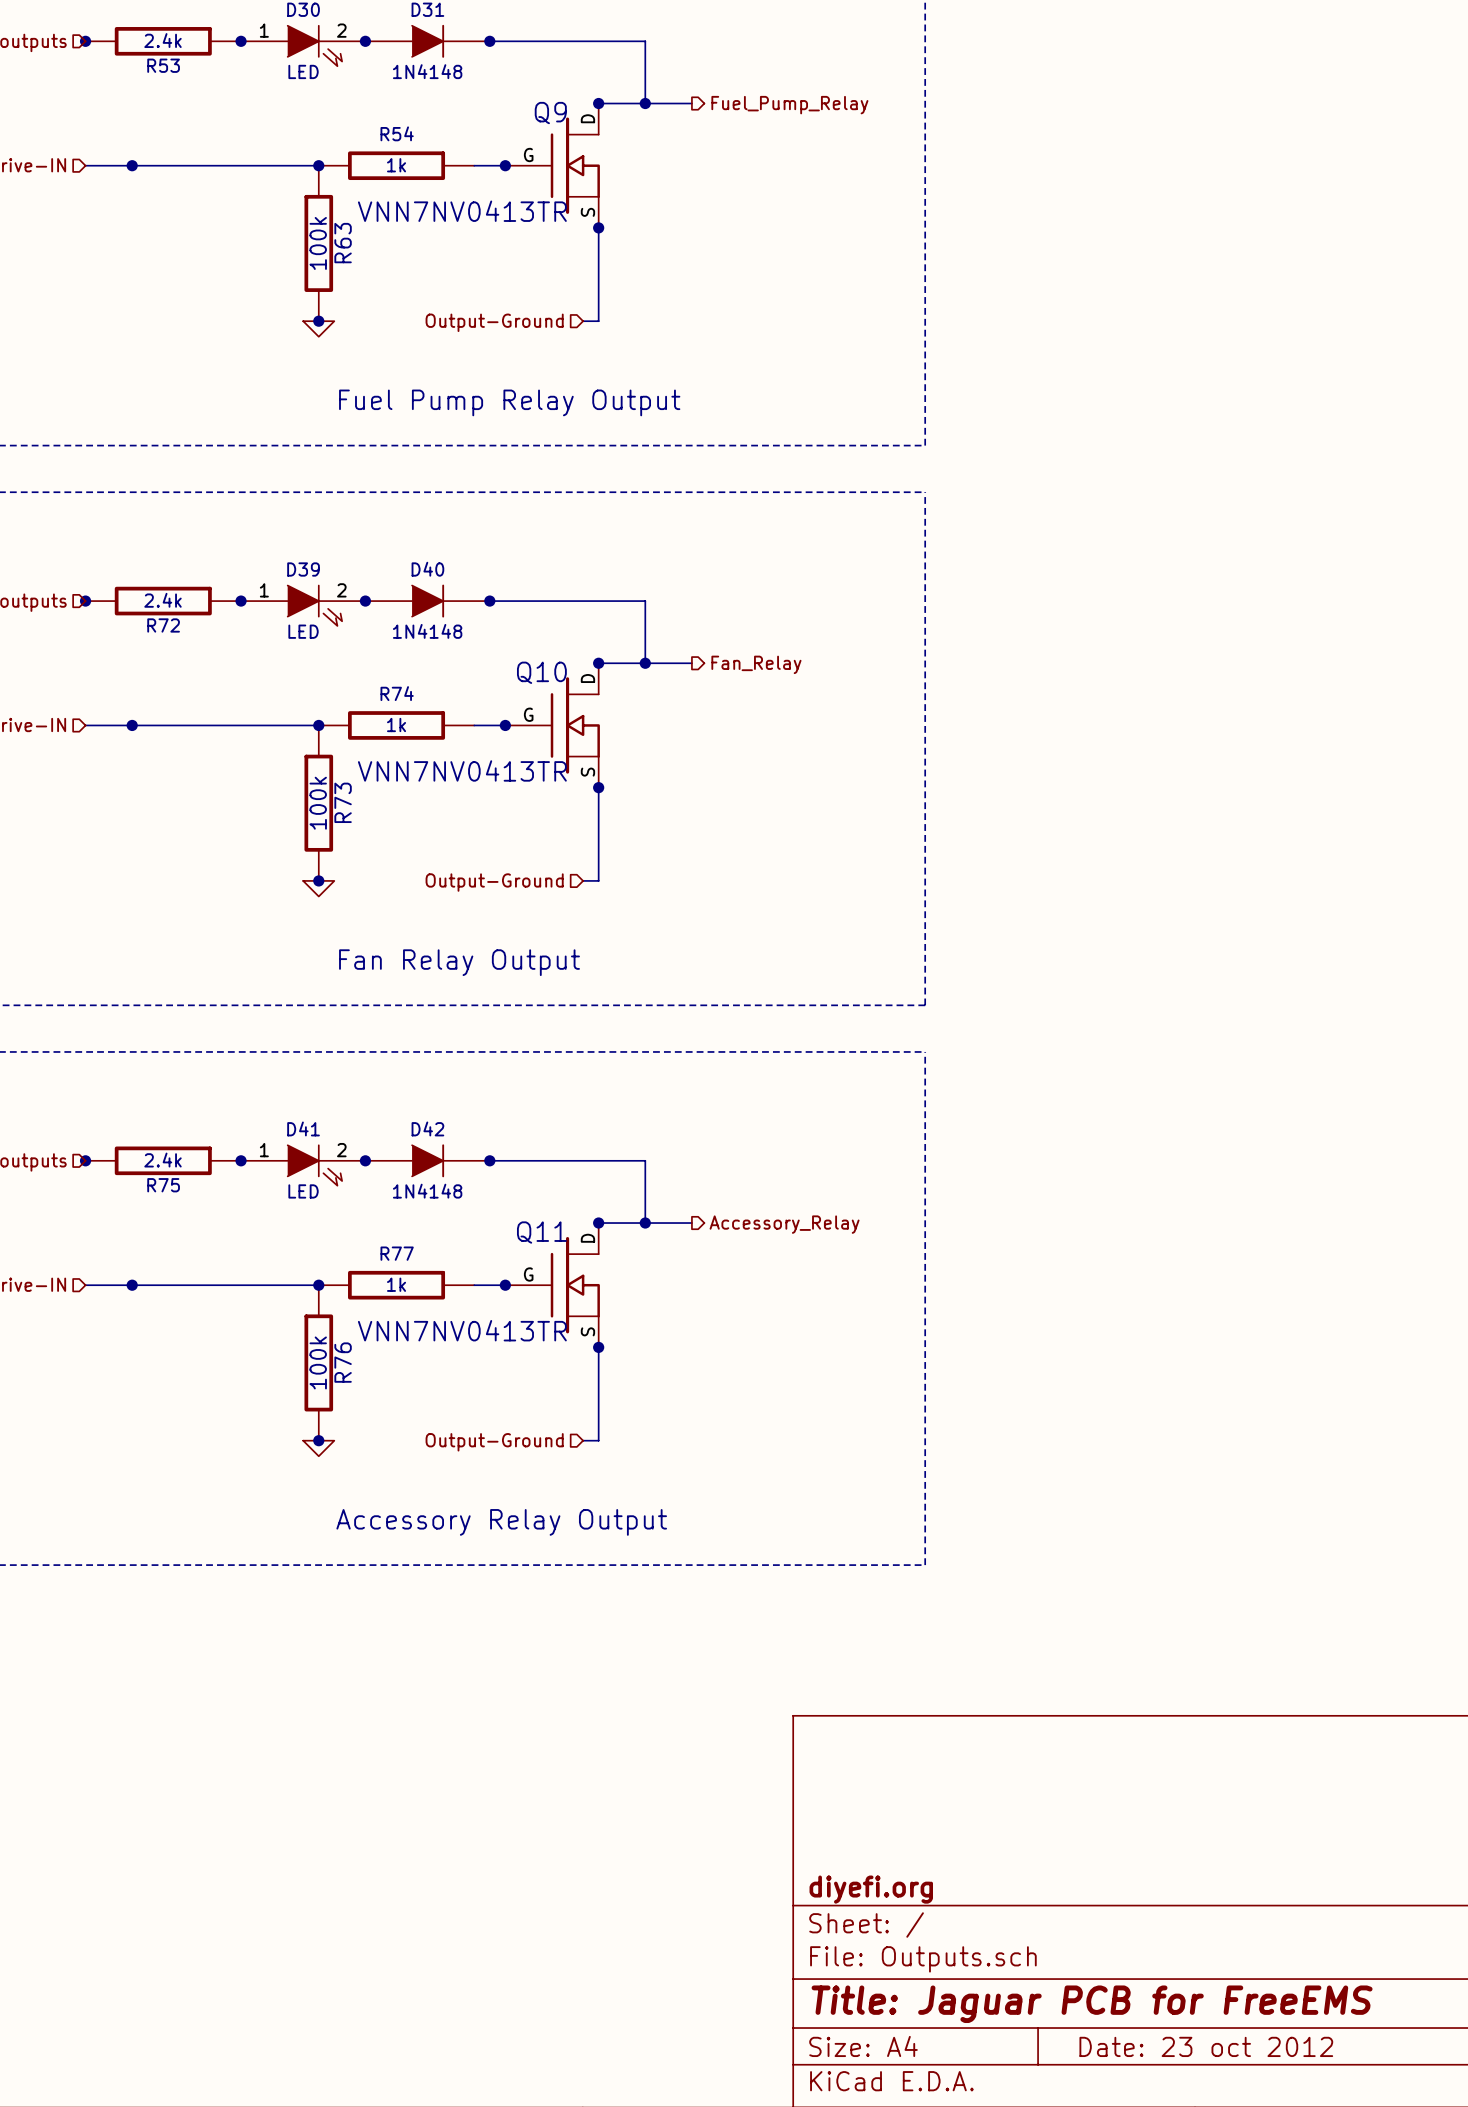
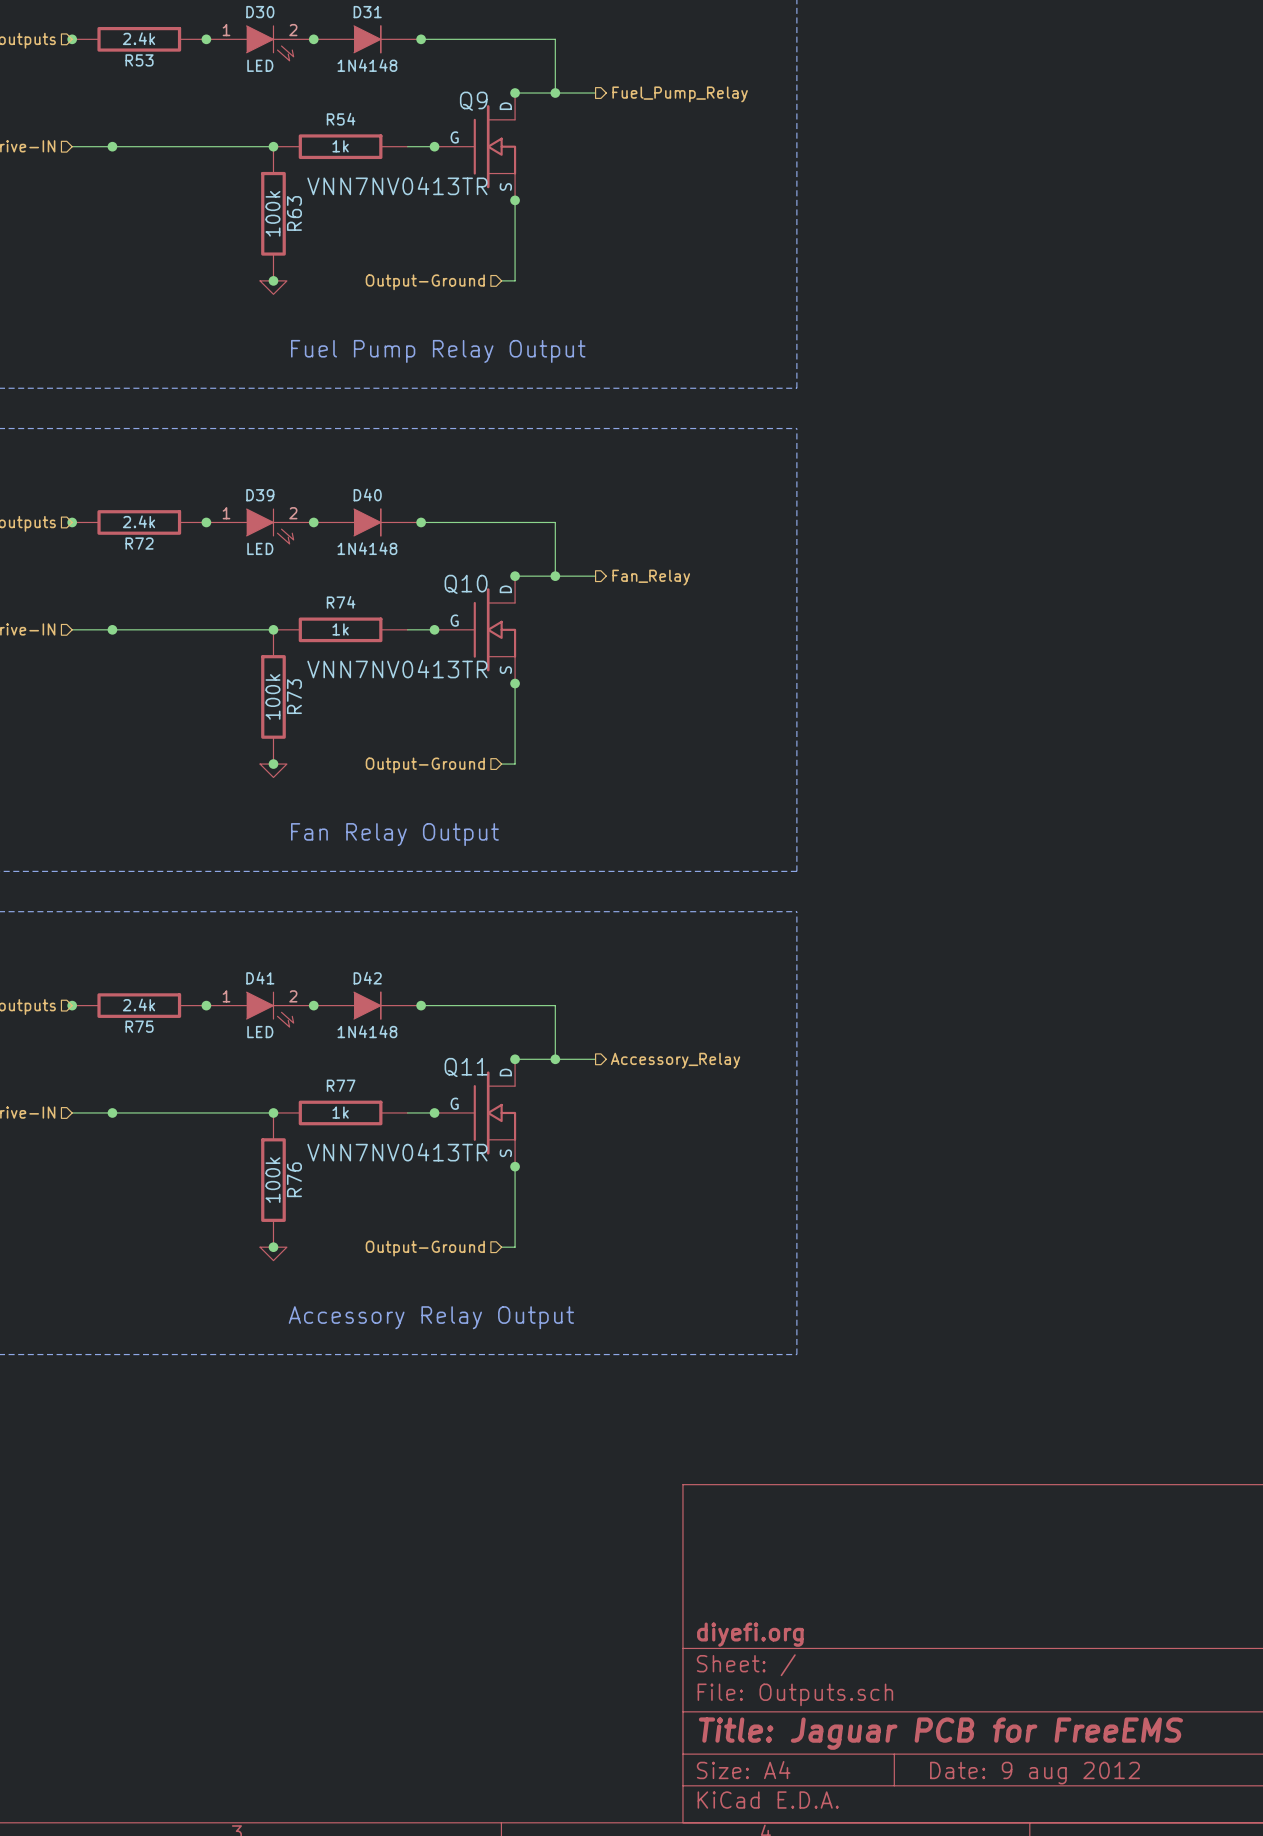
title block: Date: 23 oct 2012 (1206, 2046) -> Date: 9 aug 2012 (1035, 1773)

